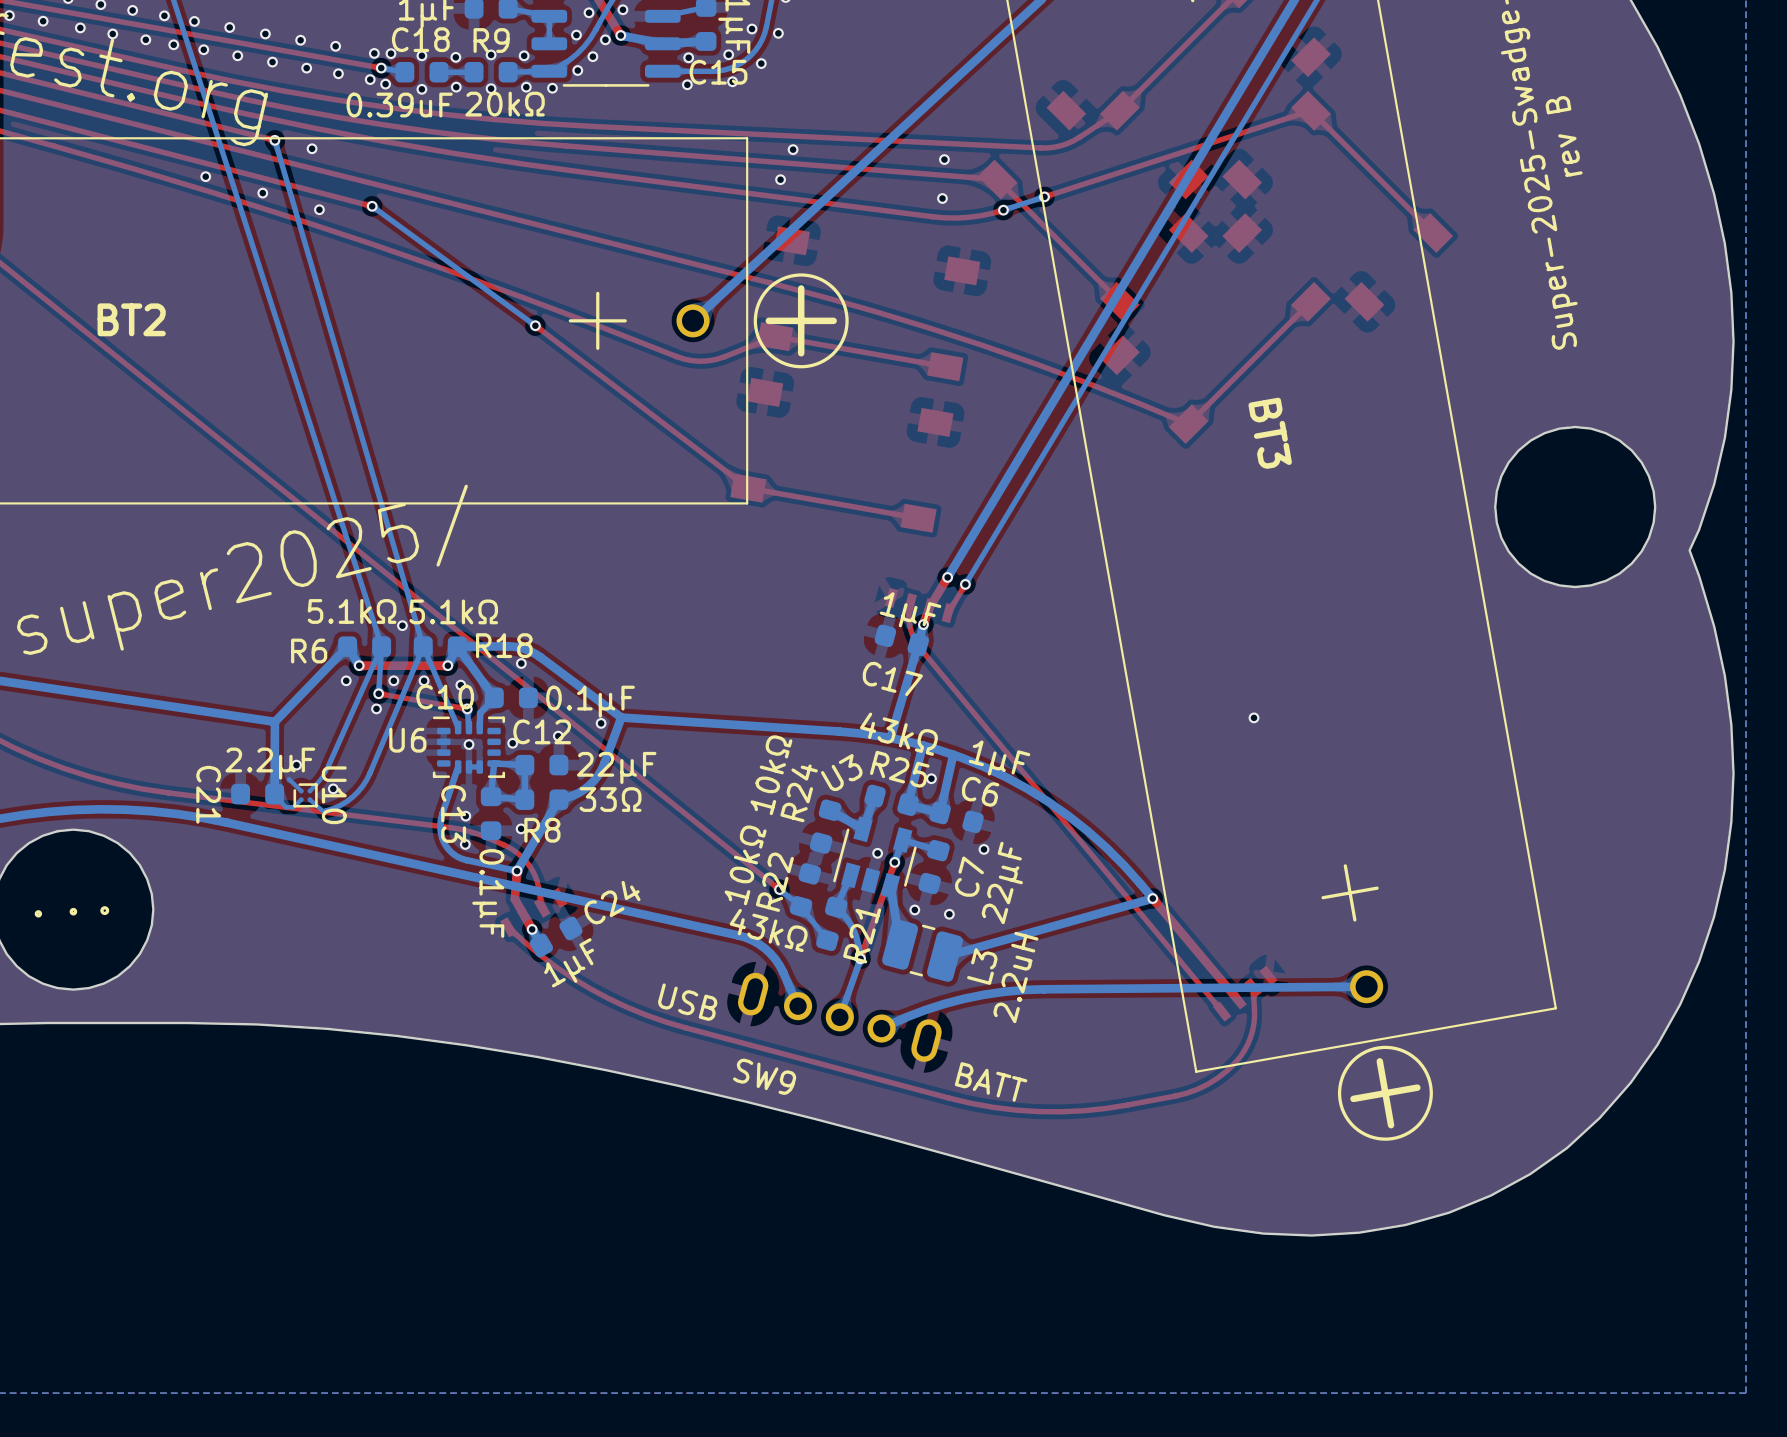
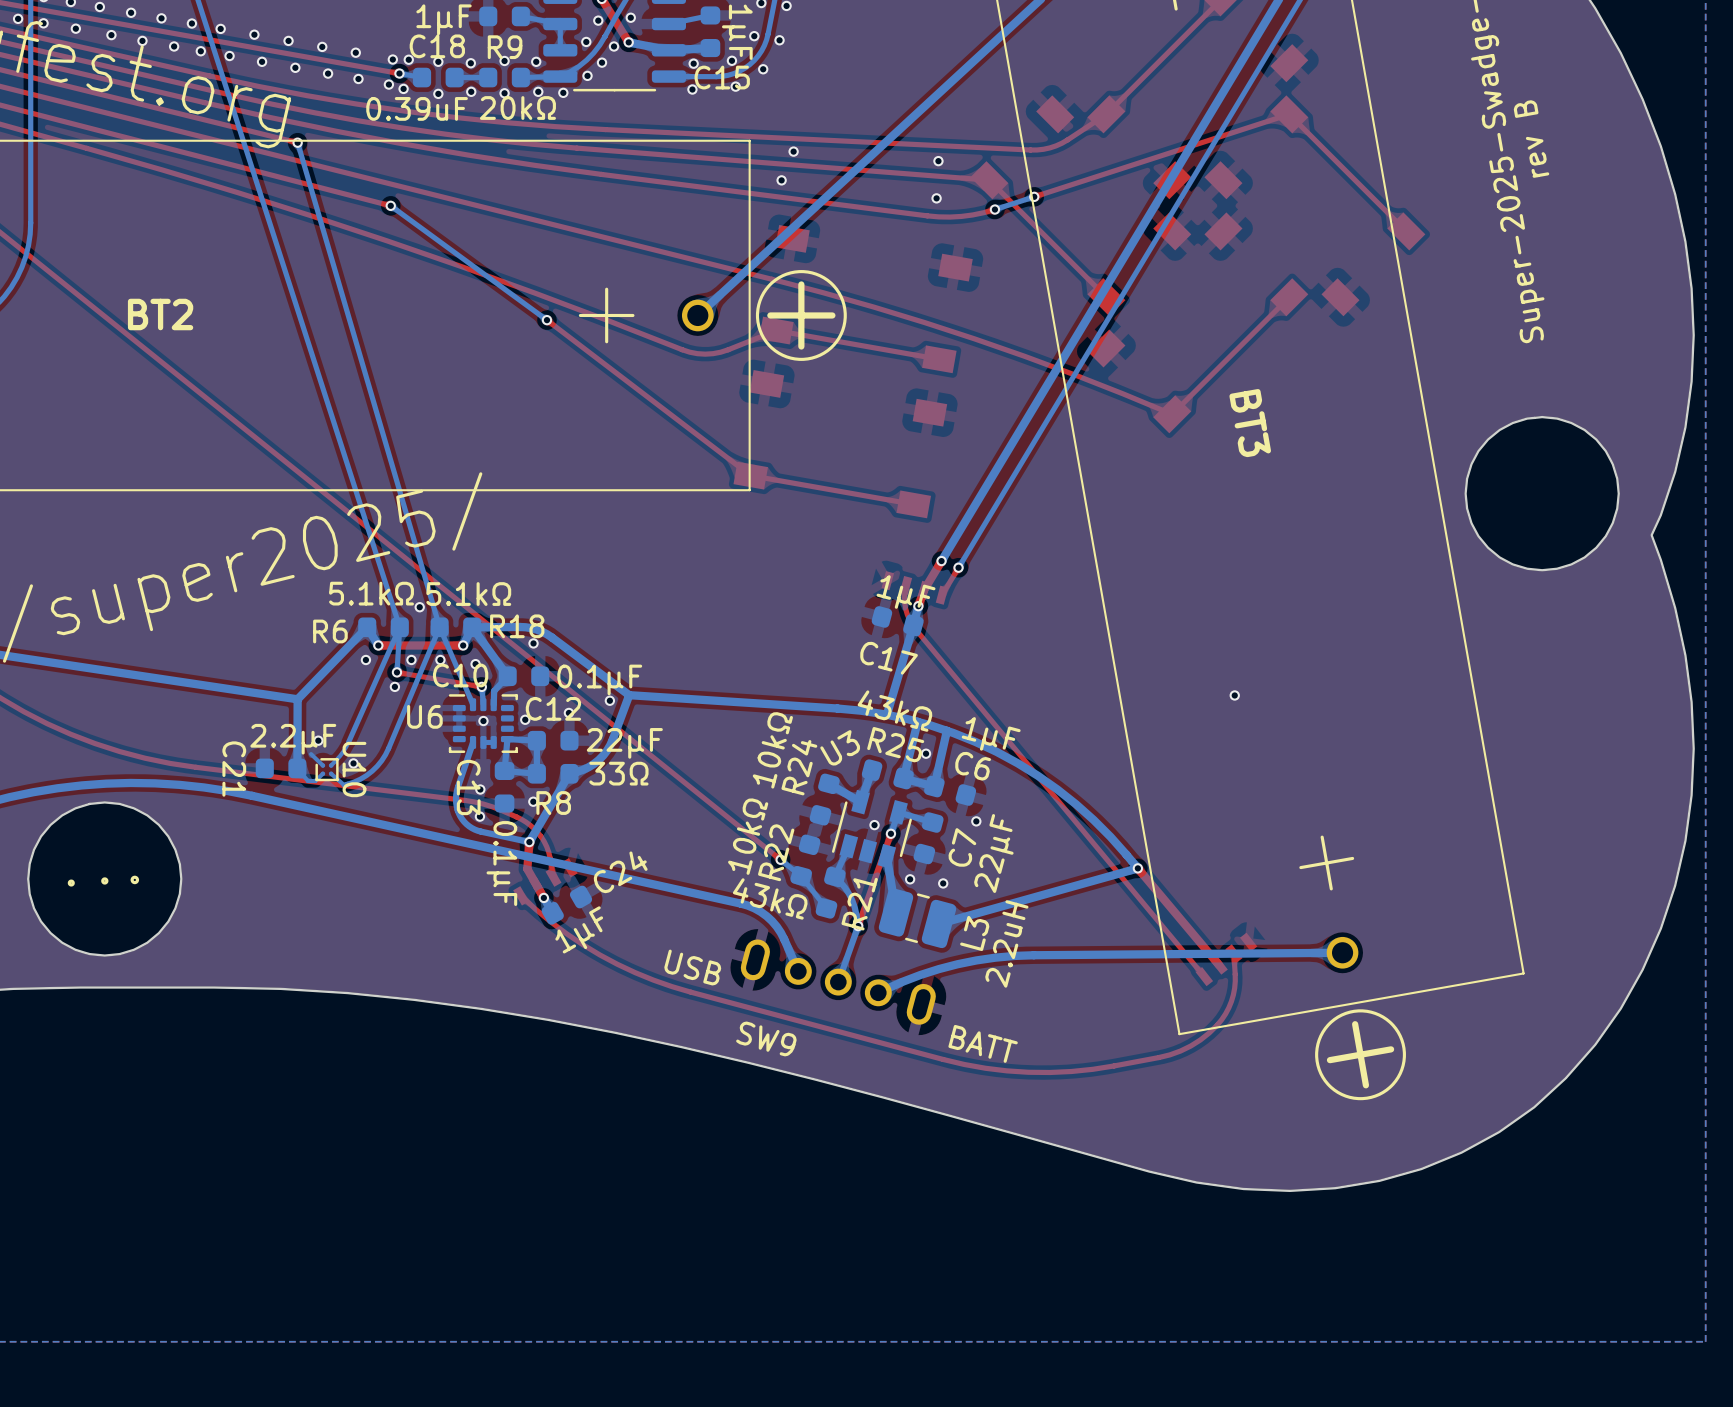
via: (312, 148) -> none
via: (205, 176) -> none
via: (262, 193) -> none
via: (319, 209) -> none

